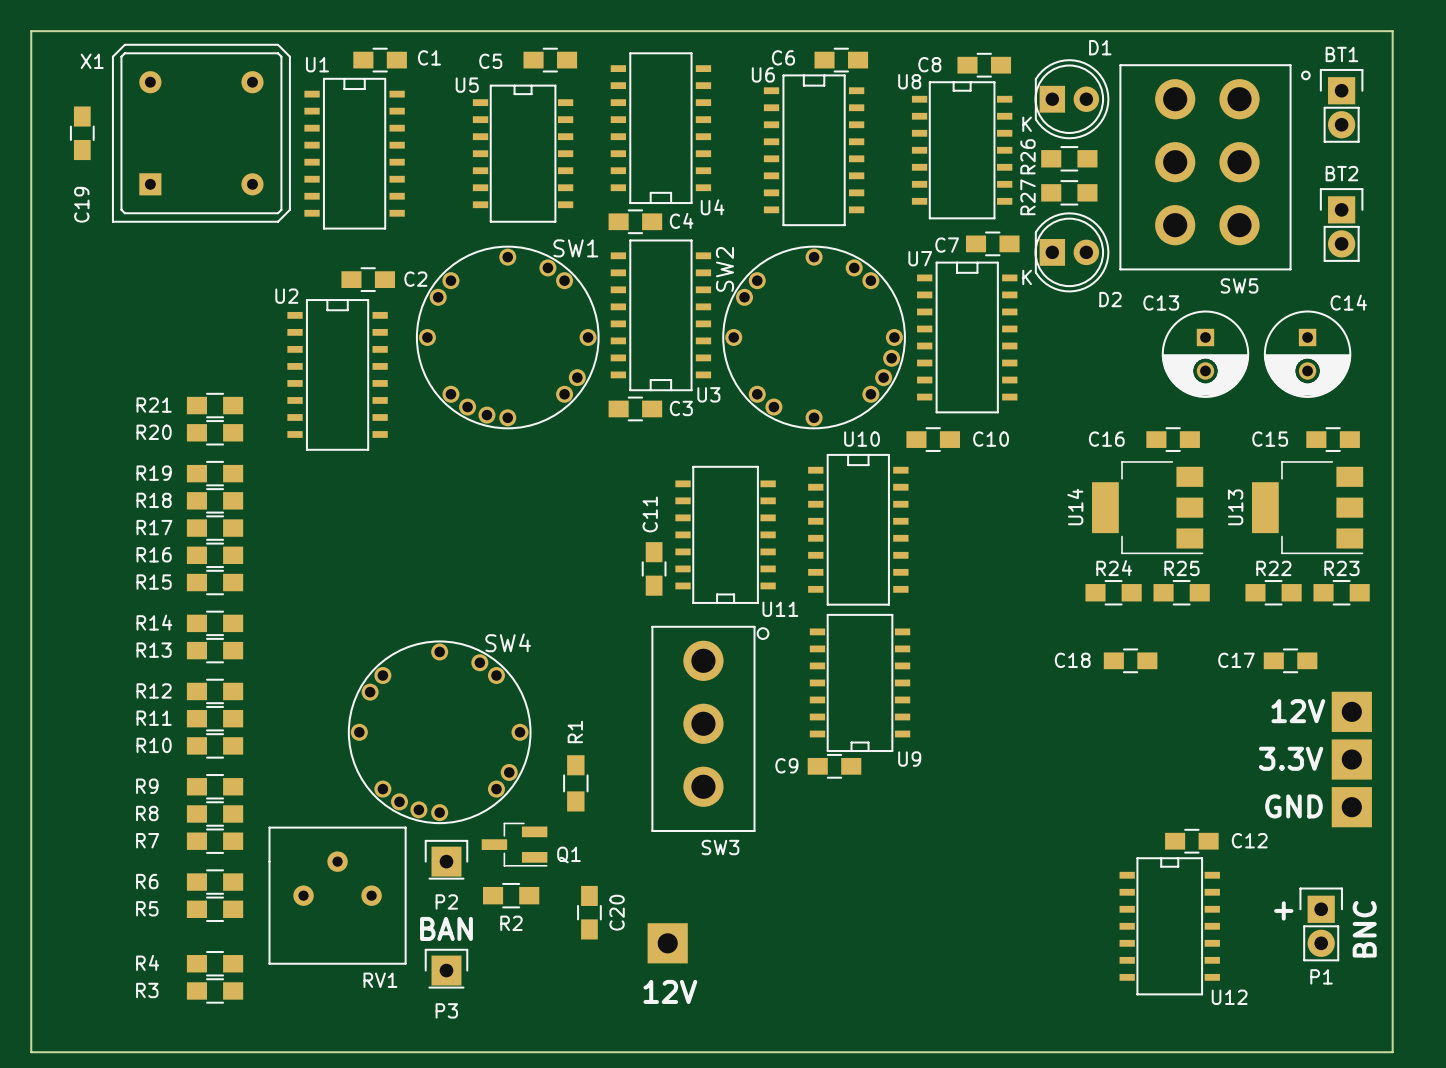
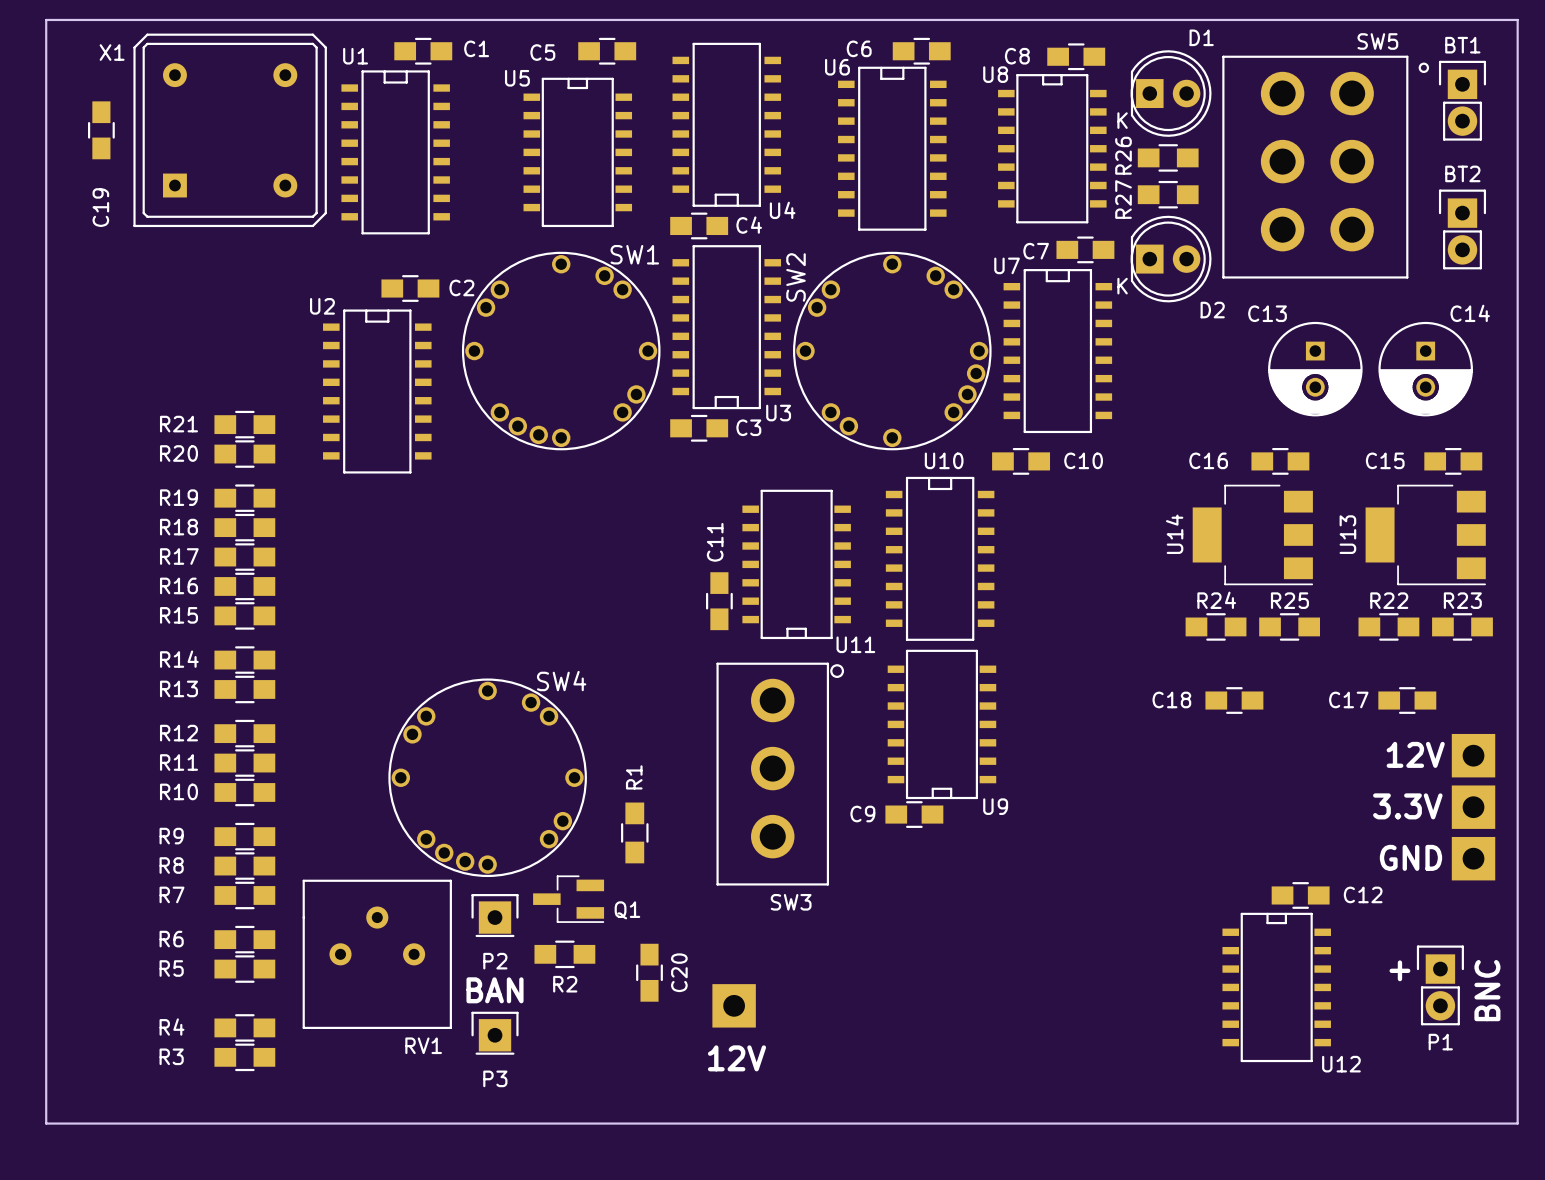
SW5 name position: SW5 (1239, 285) -> SW5 (1377, 41)

